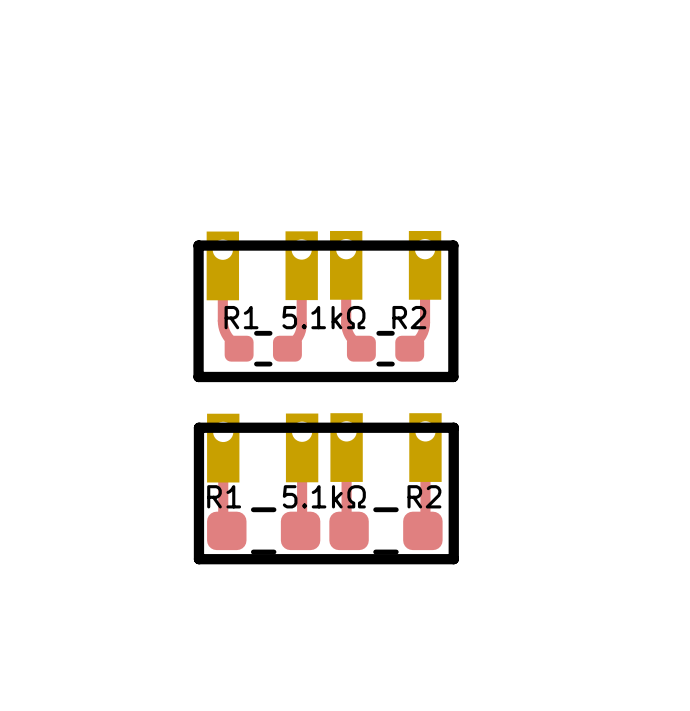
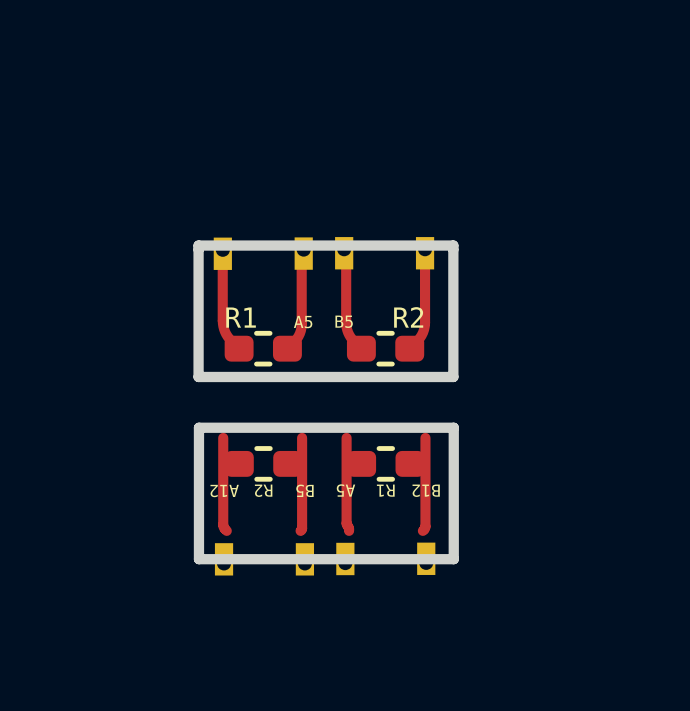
part footprint: [330, 230, 363, 300] -> [335, 237, 354, 270]
part footprint: [408, 230, 442, 300] -> [415, 237, 435, 270]
part footprint: [206, 231, 240, 301] -> [213, 237, 232, 270]
part footprint: [285, 231, 318, 301] -> [294, 237, 313, 270]
text: 5.1kΩ (323, 317) -> none
part value: none -> A5 (303, 322)
part value: none -> B5 (344, 321)
part: (302, 447) -> none
part: (346, 447) -> none
part: (425, 447) -> none
part: (223, 448) -> none
R2: none -> (263, 463)
R1: none -> (385, 463)
text: 5.1kΩ (324, 496) -> none
R1: (263, 530) -> none
R2: (385, 530) -> none
part: none -> A5 (345, 558)
part: none -> B12 (426, 558)
part: none -> A12 (224, 559)
part: none -> B5 (304, 559)

